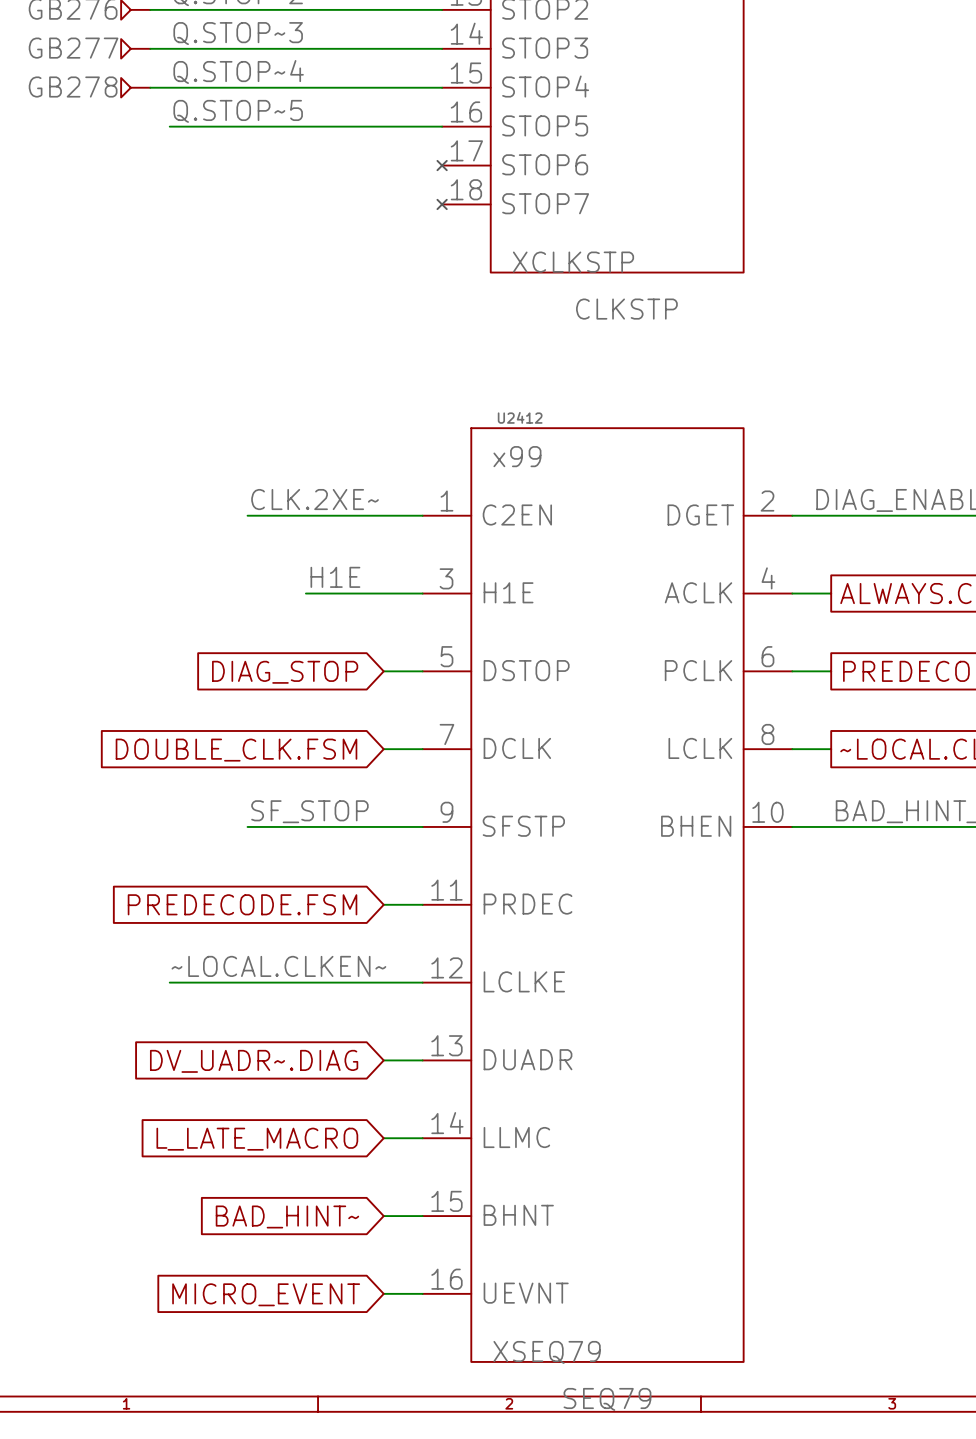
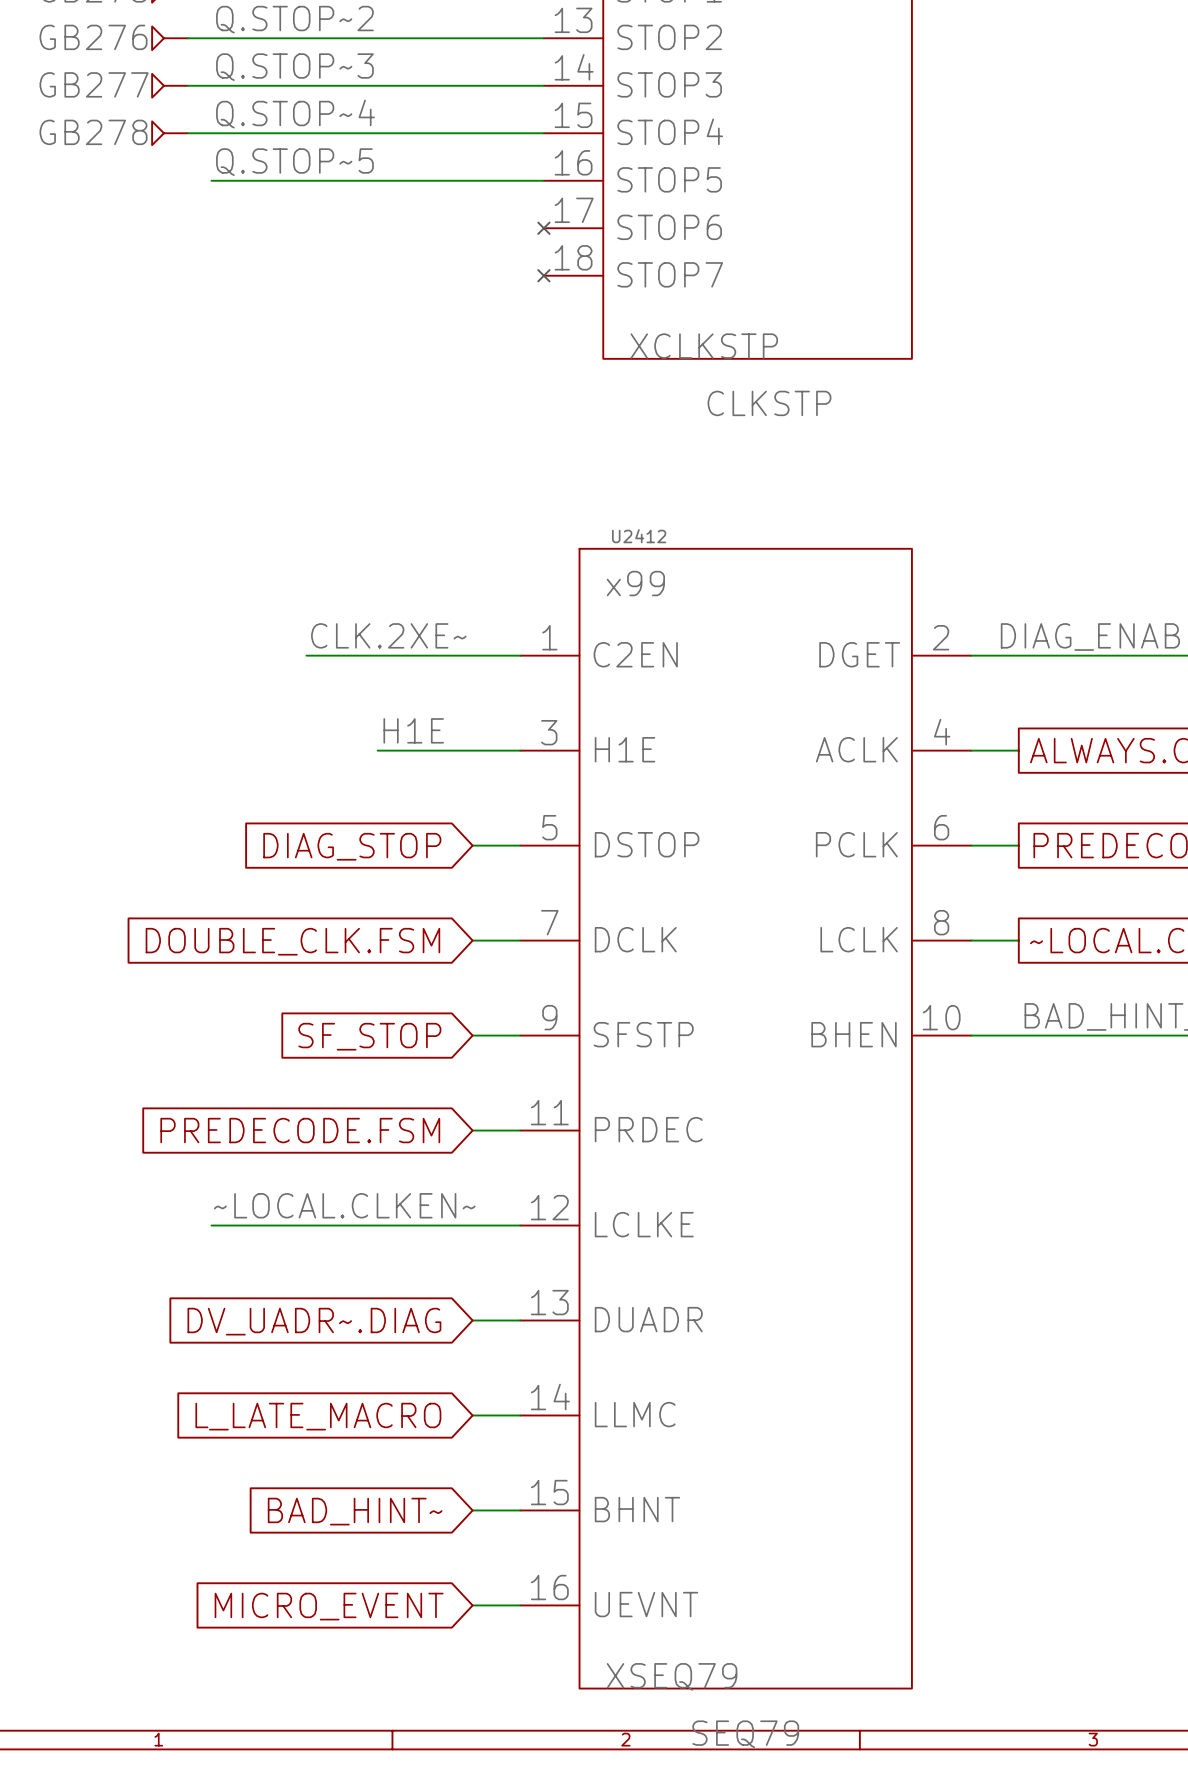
label: SF_STOP (309, 811) -> none
wire: (247, 826) (383, 826) -> none
global label: none -> SF_STOP (369, 1036)

